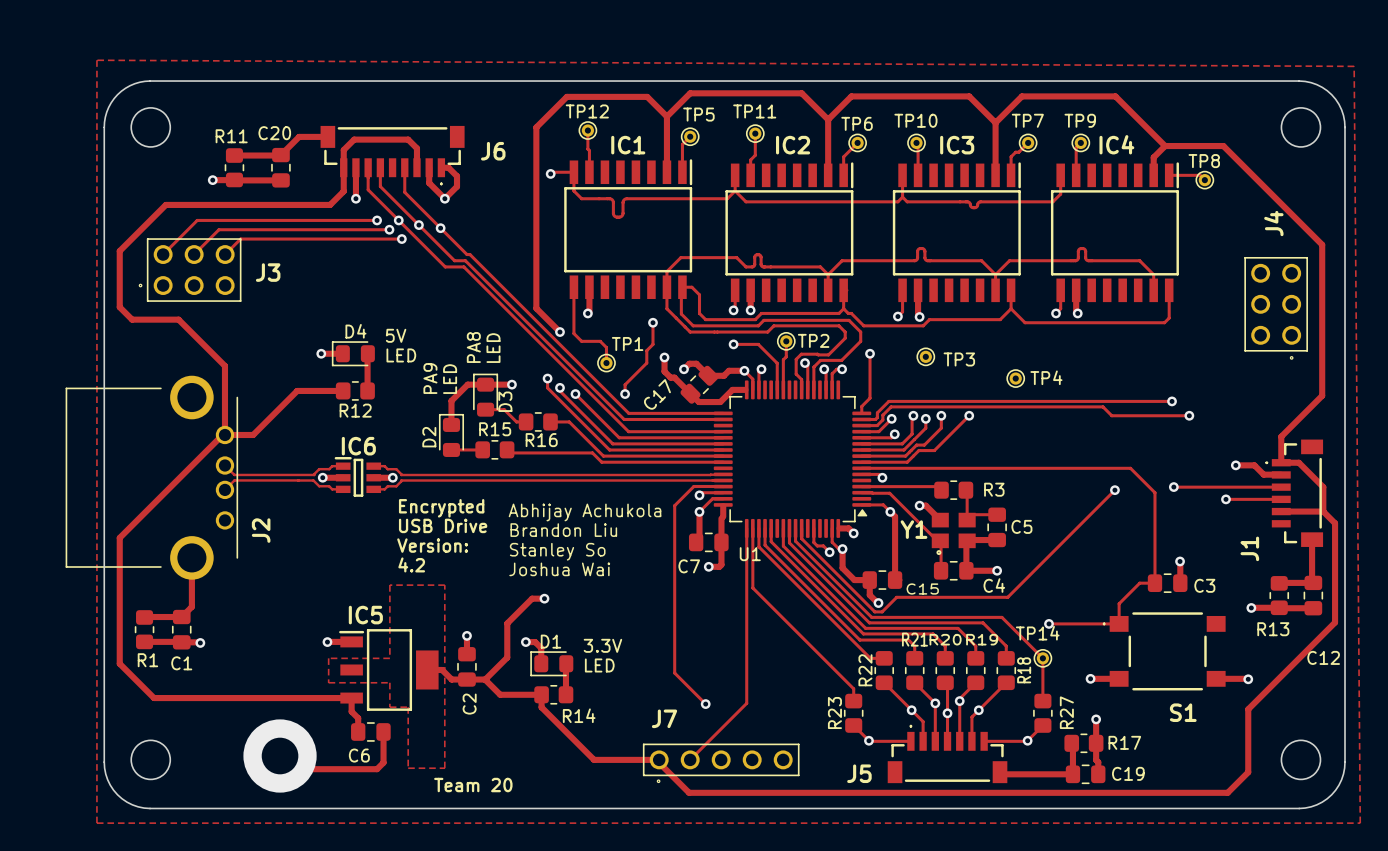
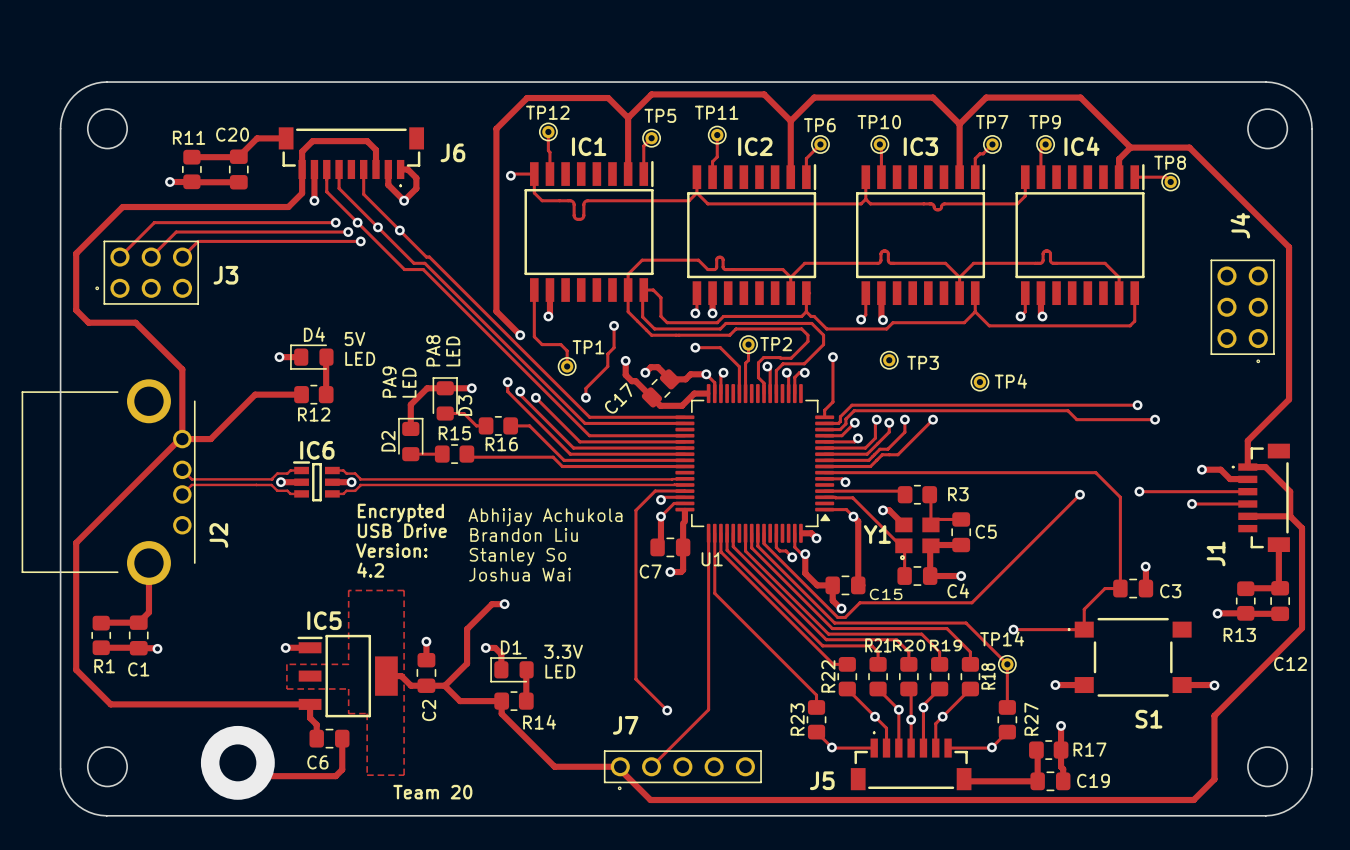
zone outline: (96, 60) (96, 823) (1360, 823) (1354, 66) (96, 60) -> none

